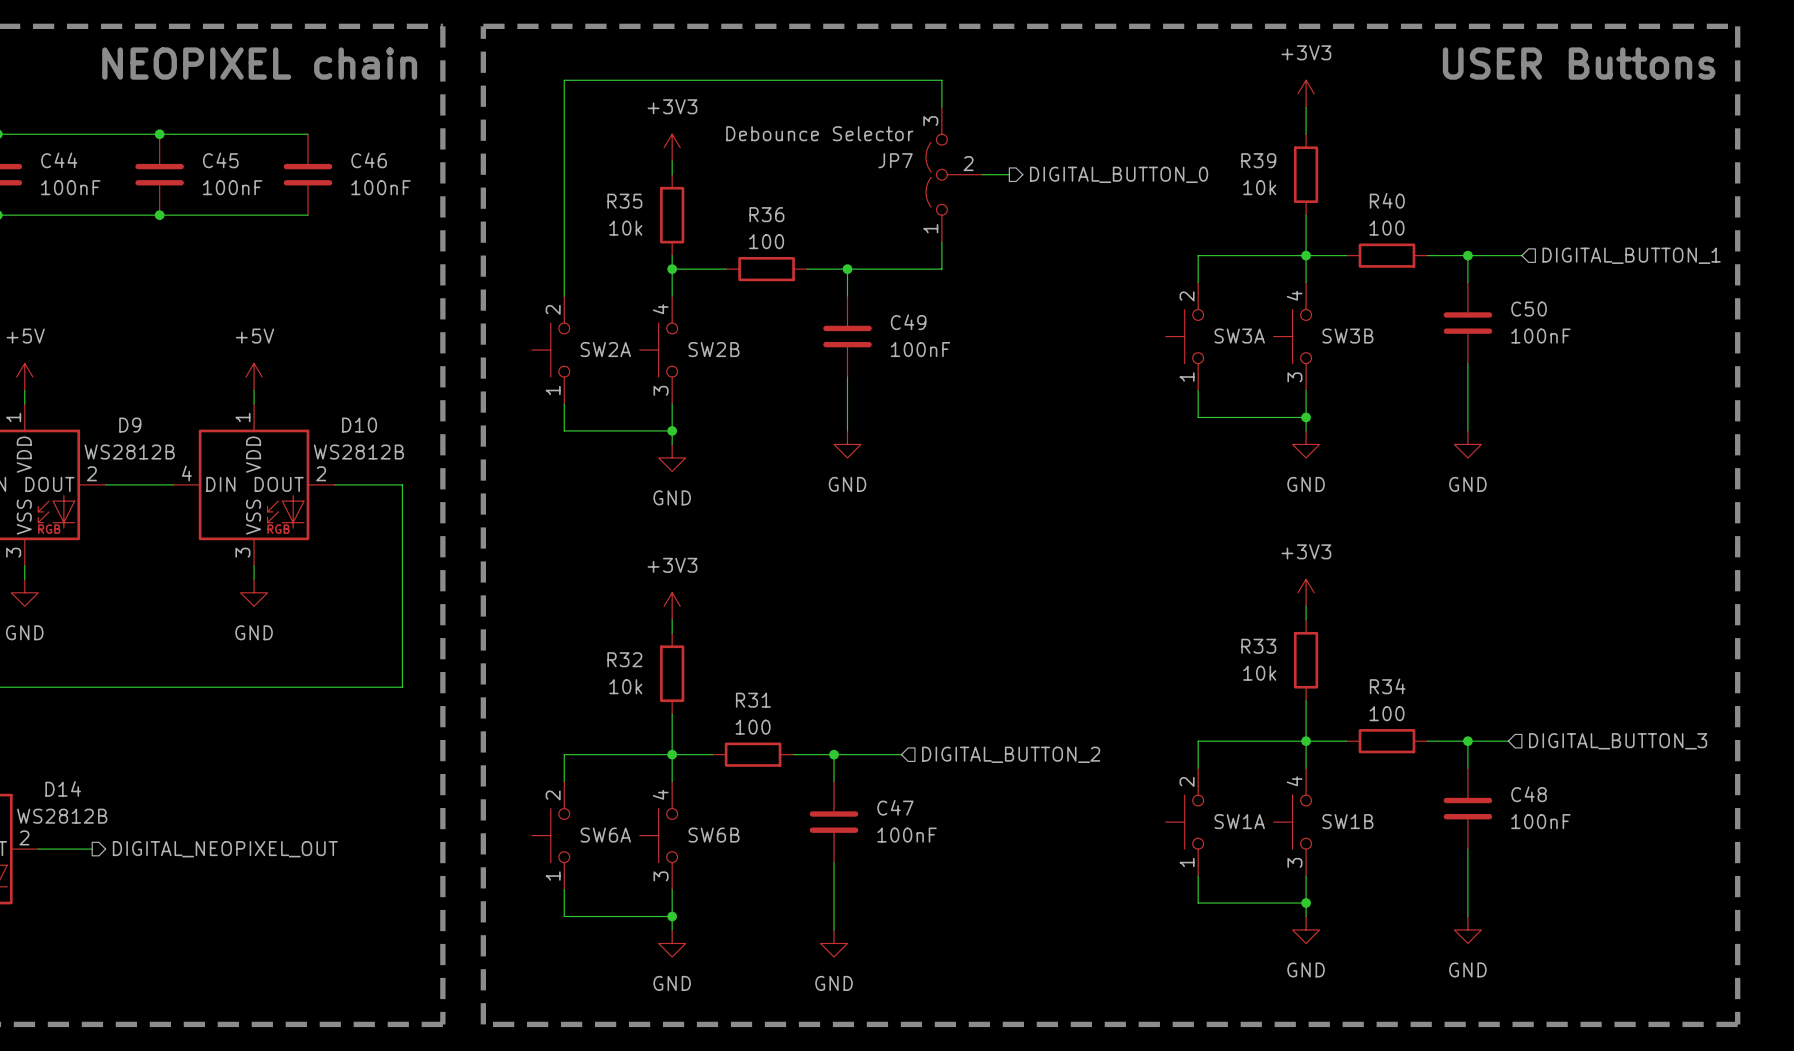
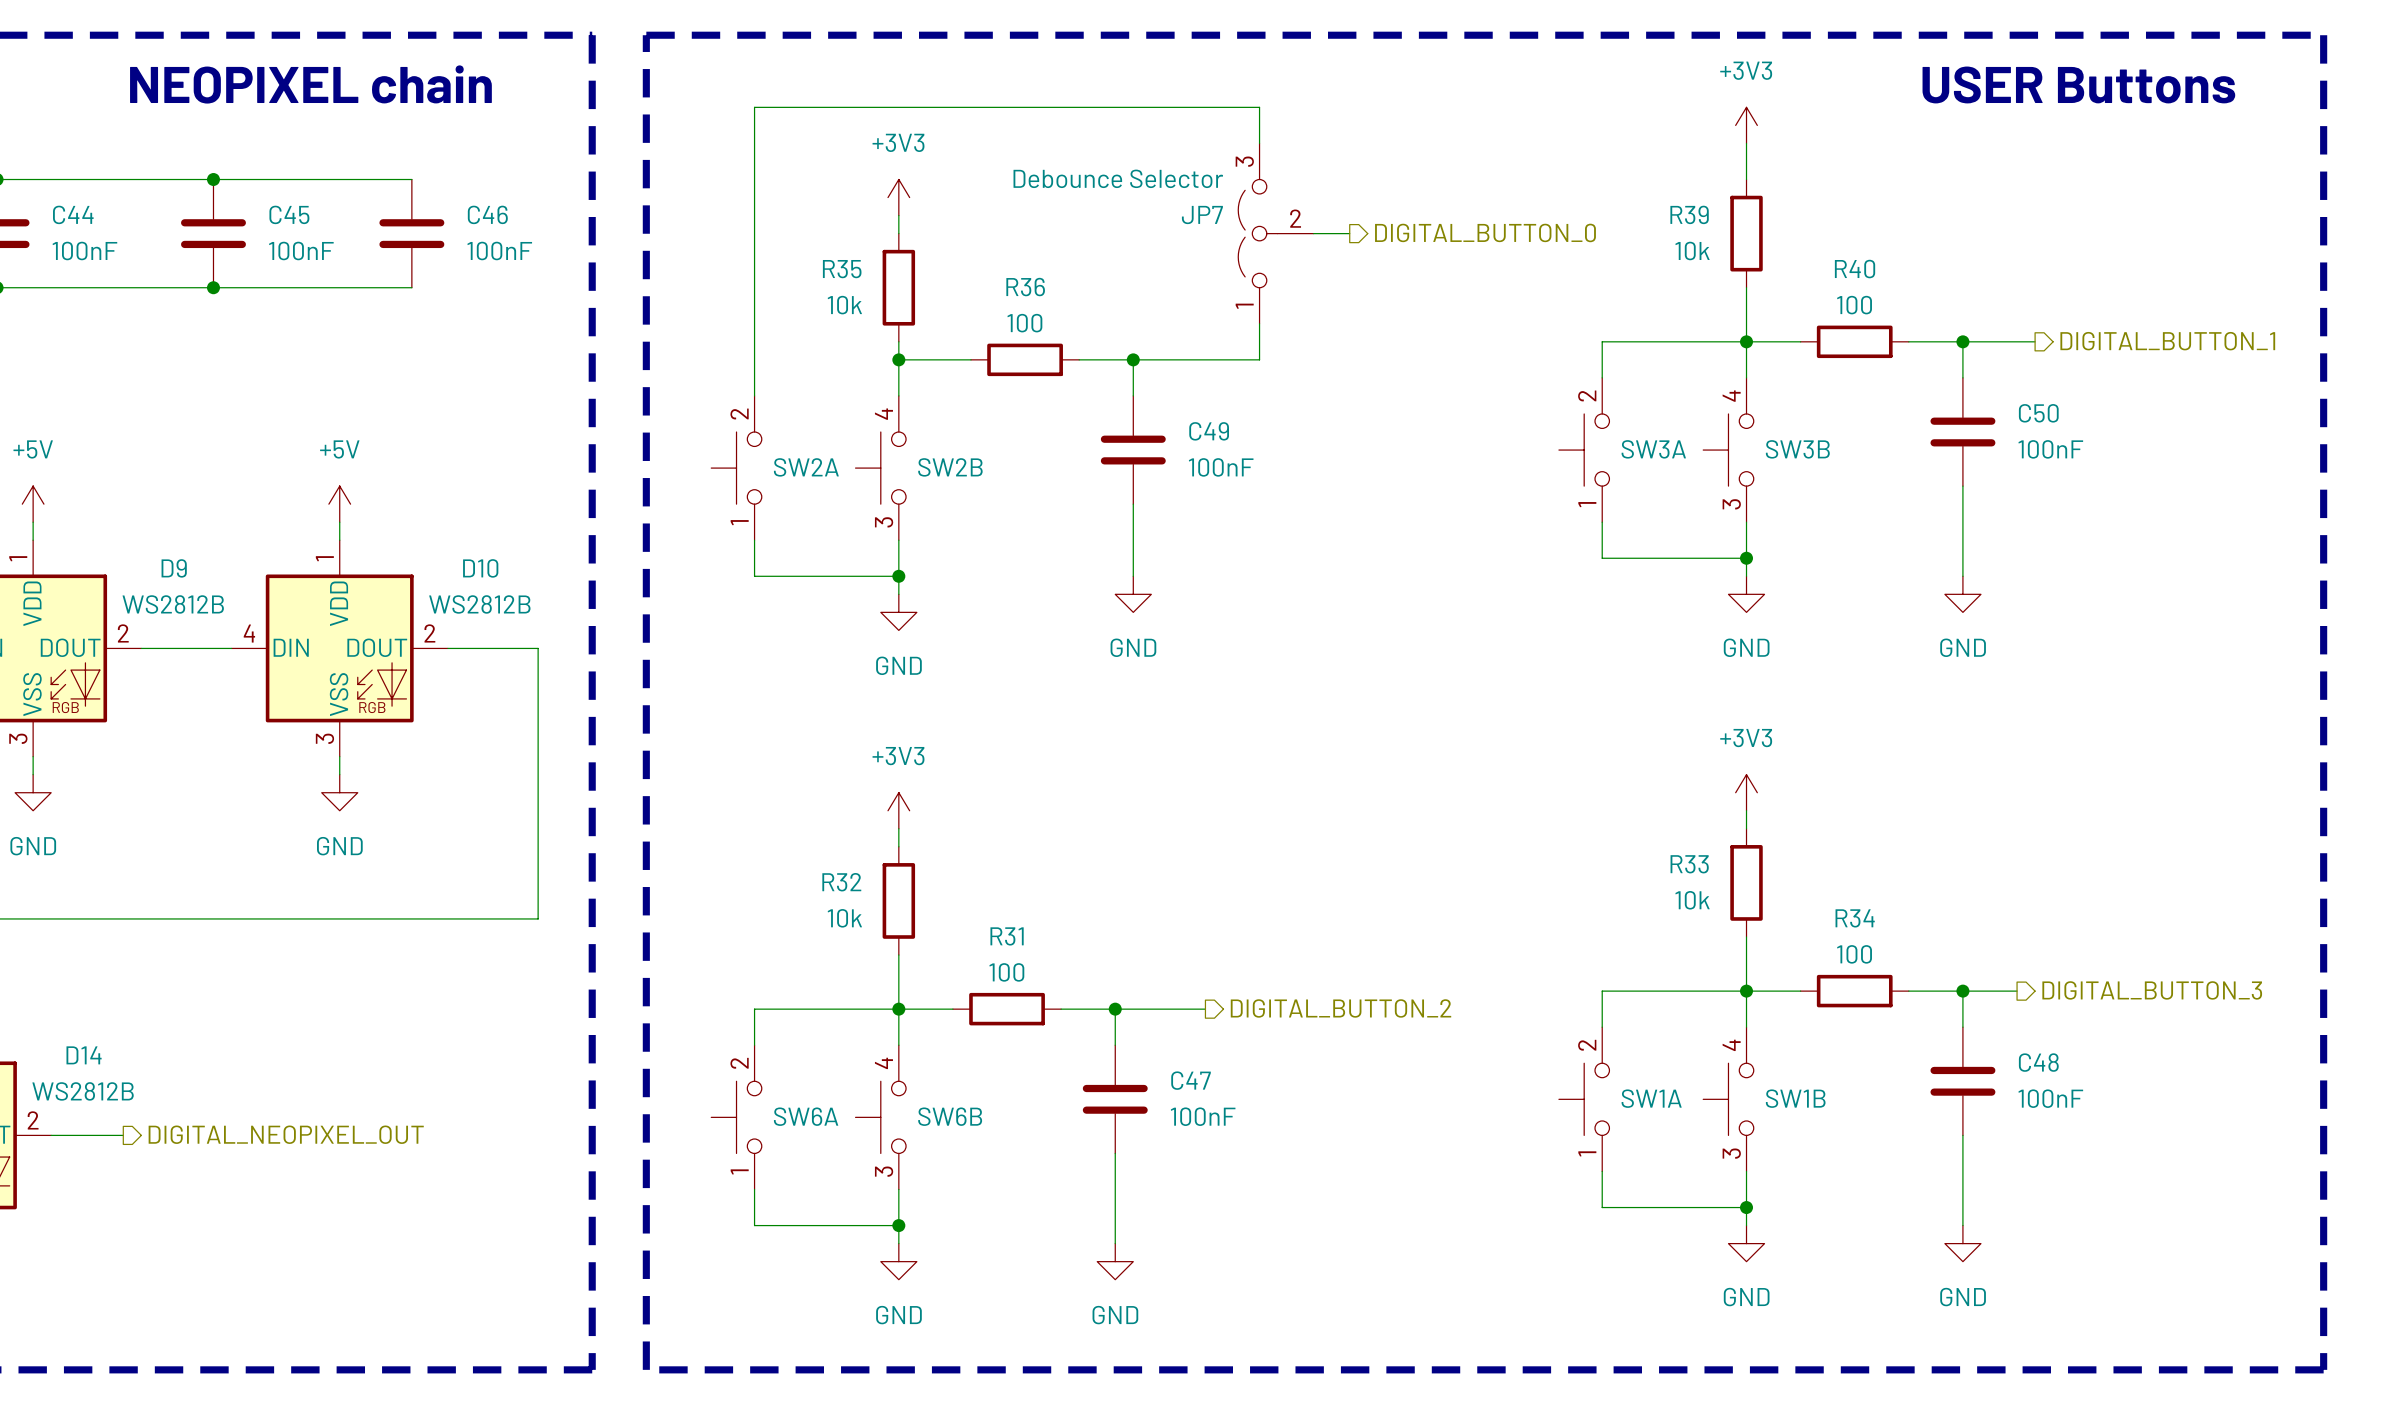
hierarchical label shape: input (1631, 255) -> output (2167, 341)
hierarchical label shape: input (1618, 741) -> output (2152, 990)
hierarchical label shape: input (1011, 754) -> output (1340, 1008)

